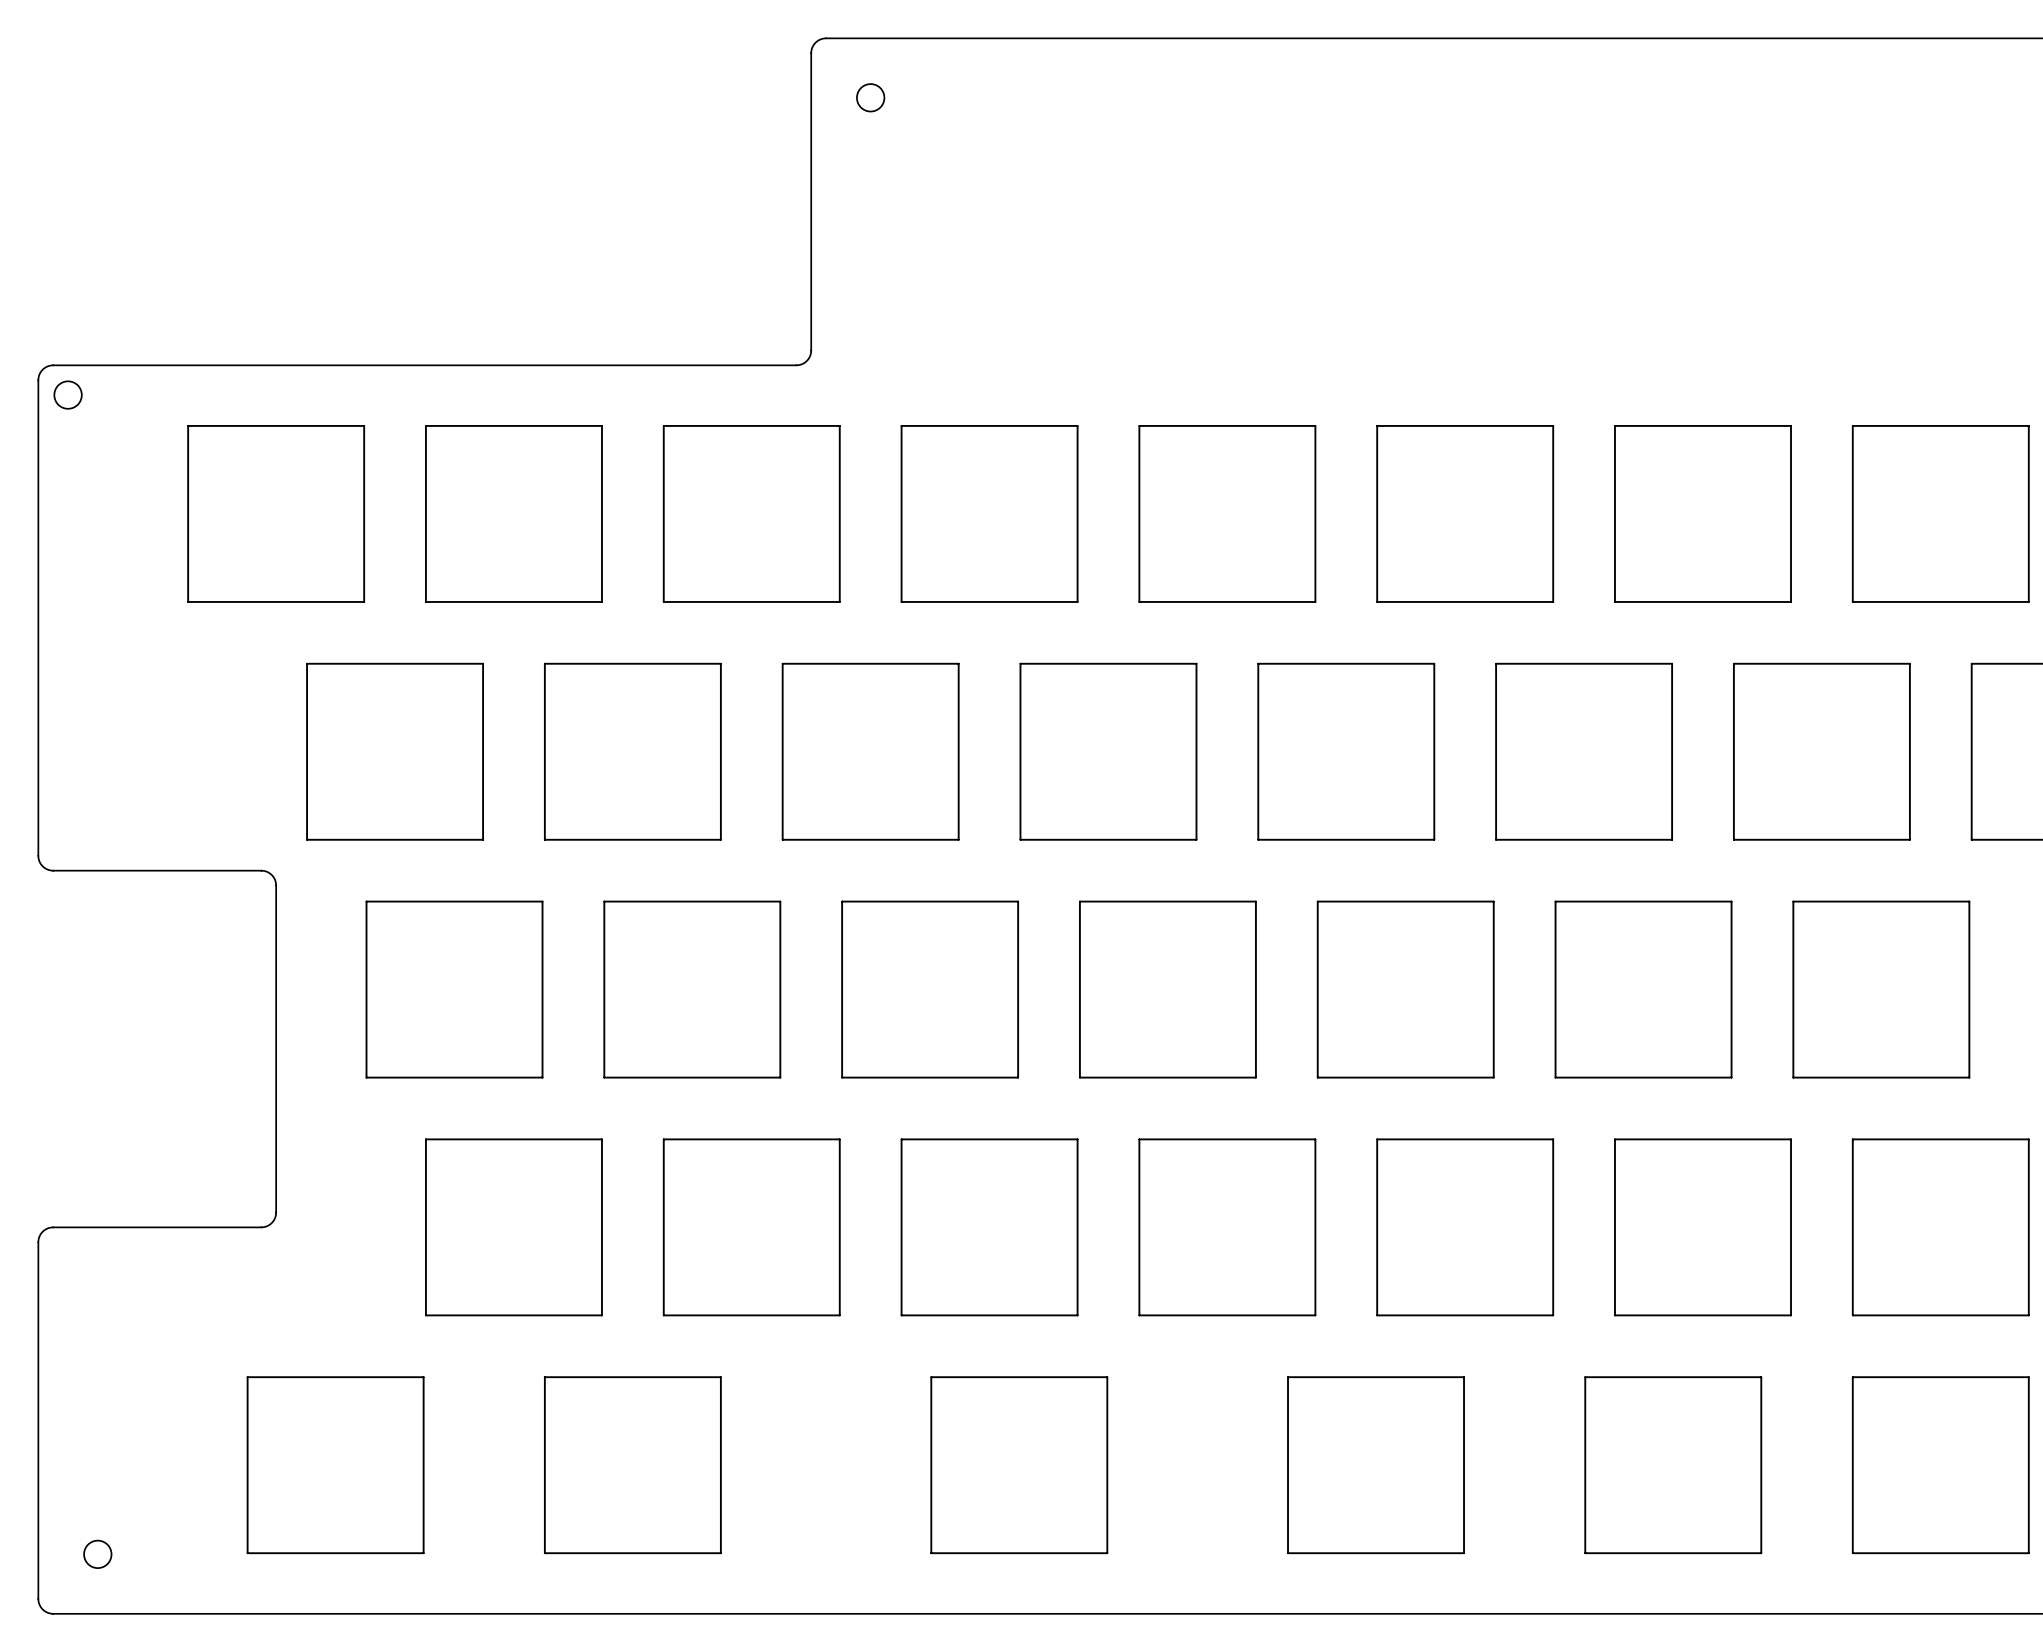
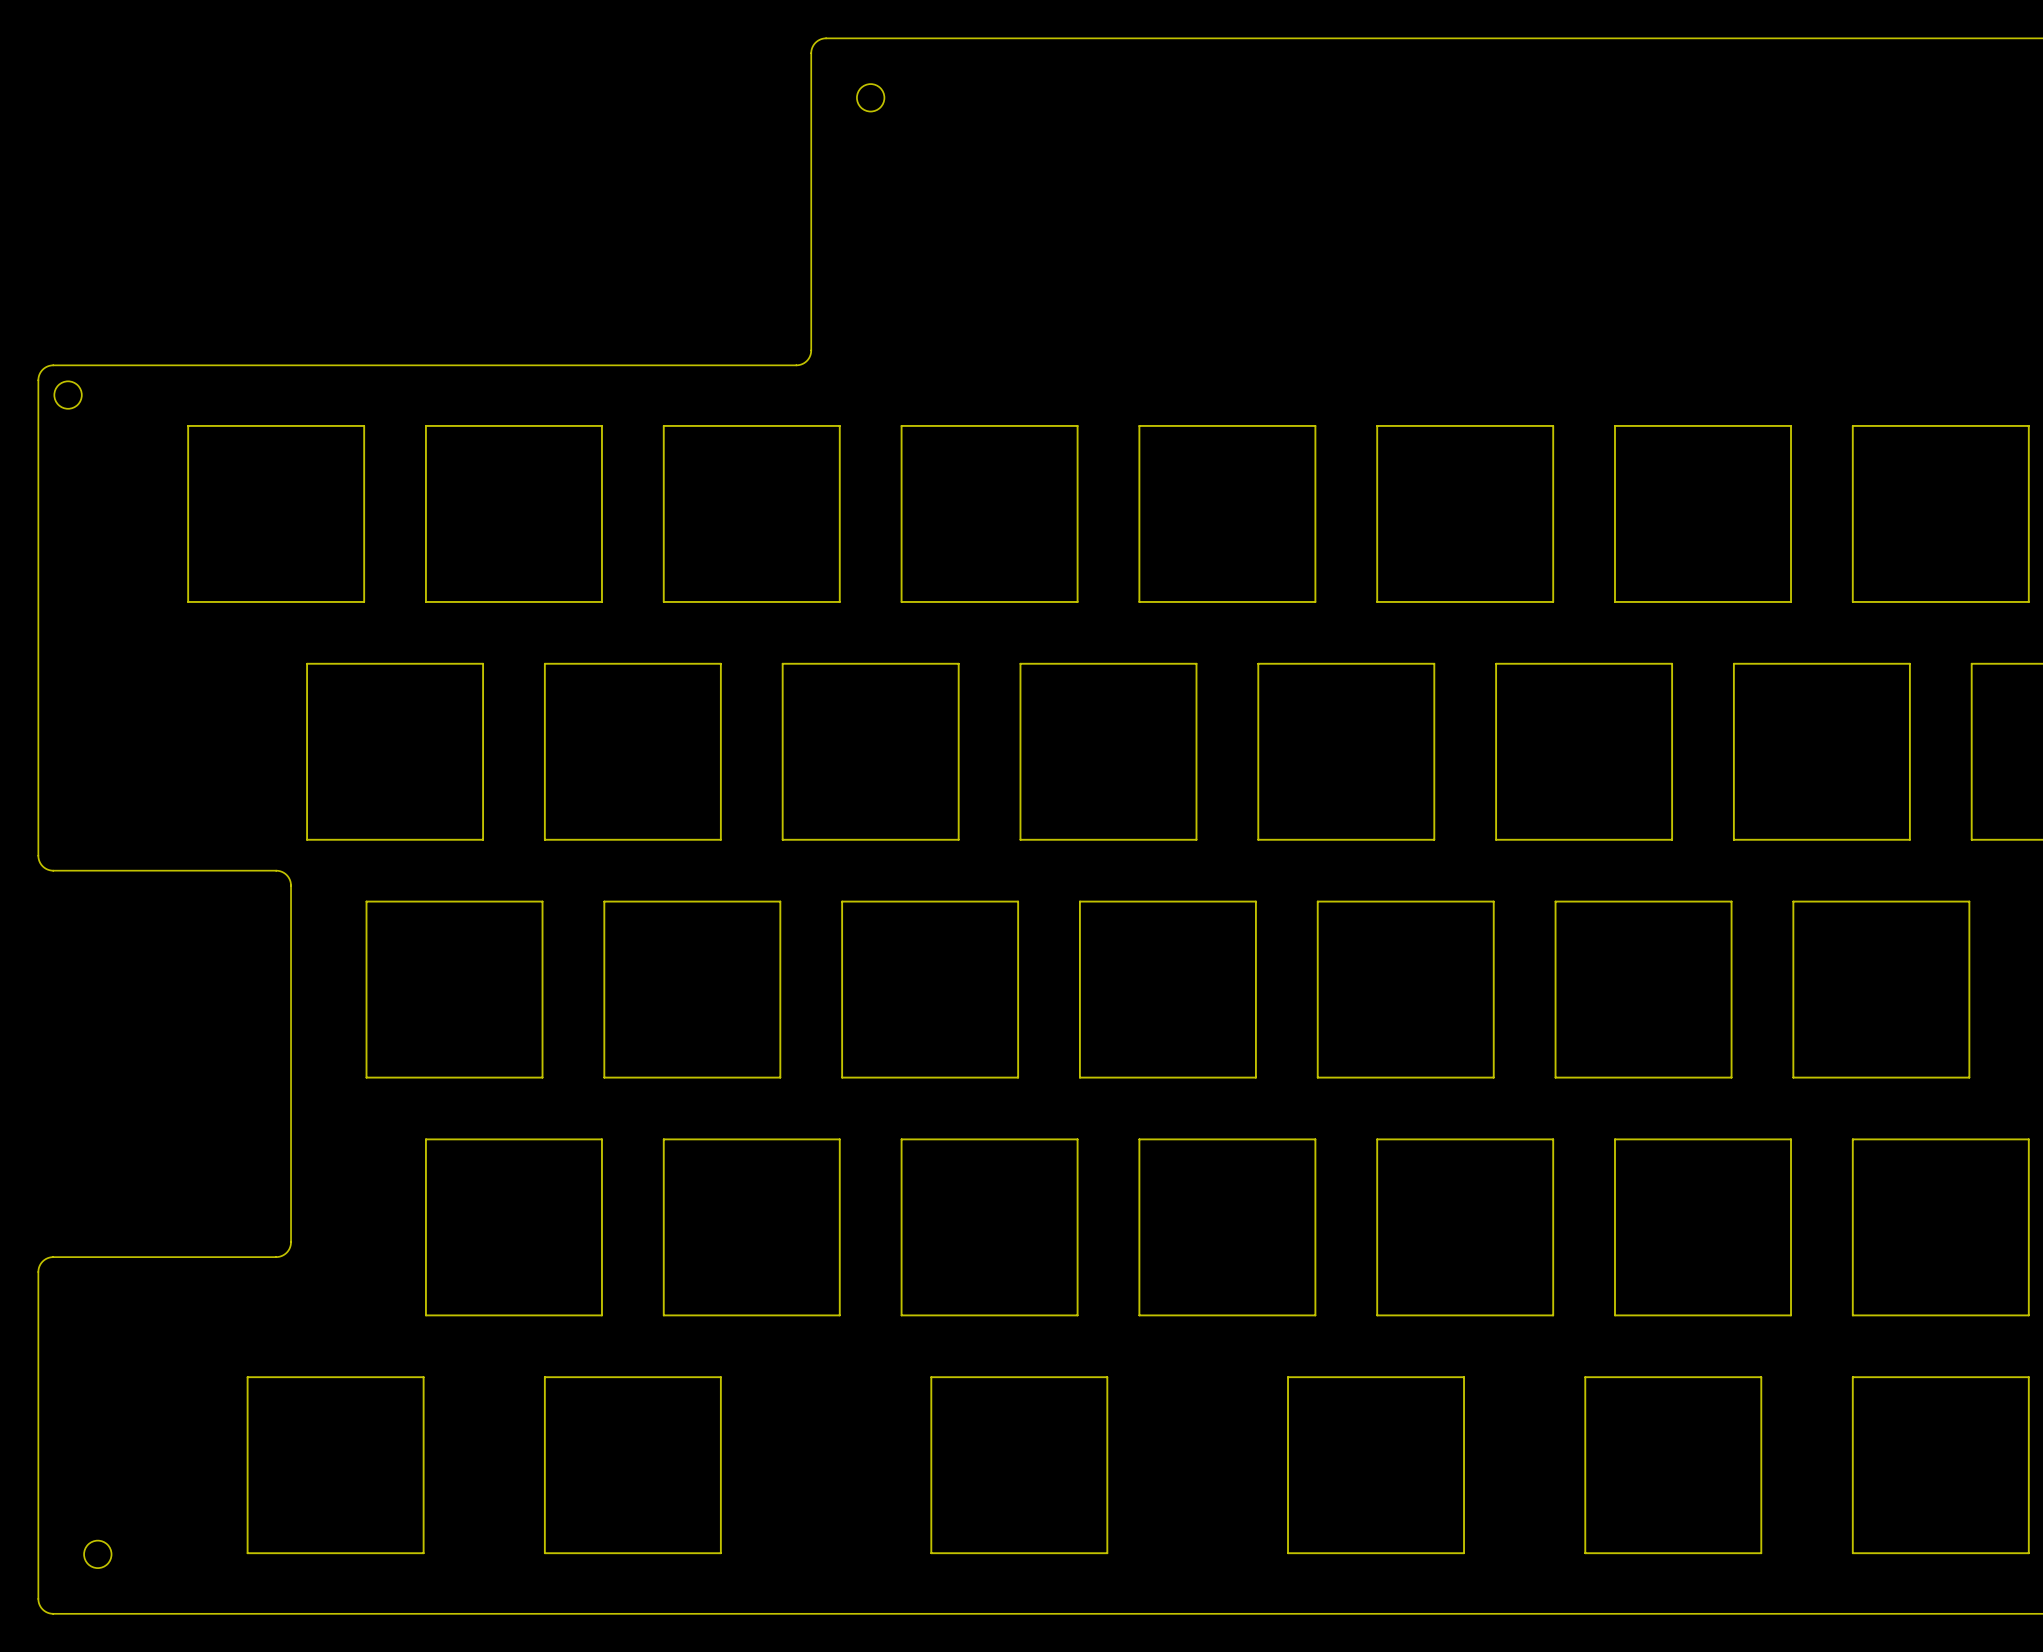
board edge: (261, 870) (271, 875) (276, 885) (276, 1212) (274, 1219) (268, 1225) (261, 1227) (49, 1227) (42, 1231) (38, 1238) (38, 1271) -> (261, 870) (281, 871) (287, 876) (290, 883) (291, 1242) (288, 1250) (282, 1255) (276, 1257) (51, 1257) (41, 1262) (38, 1271)

